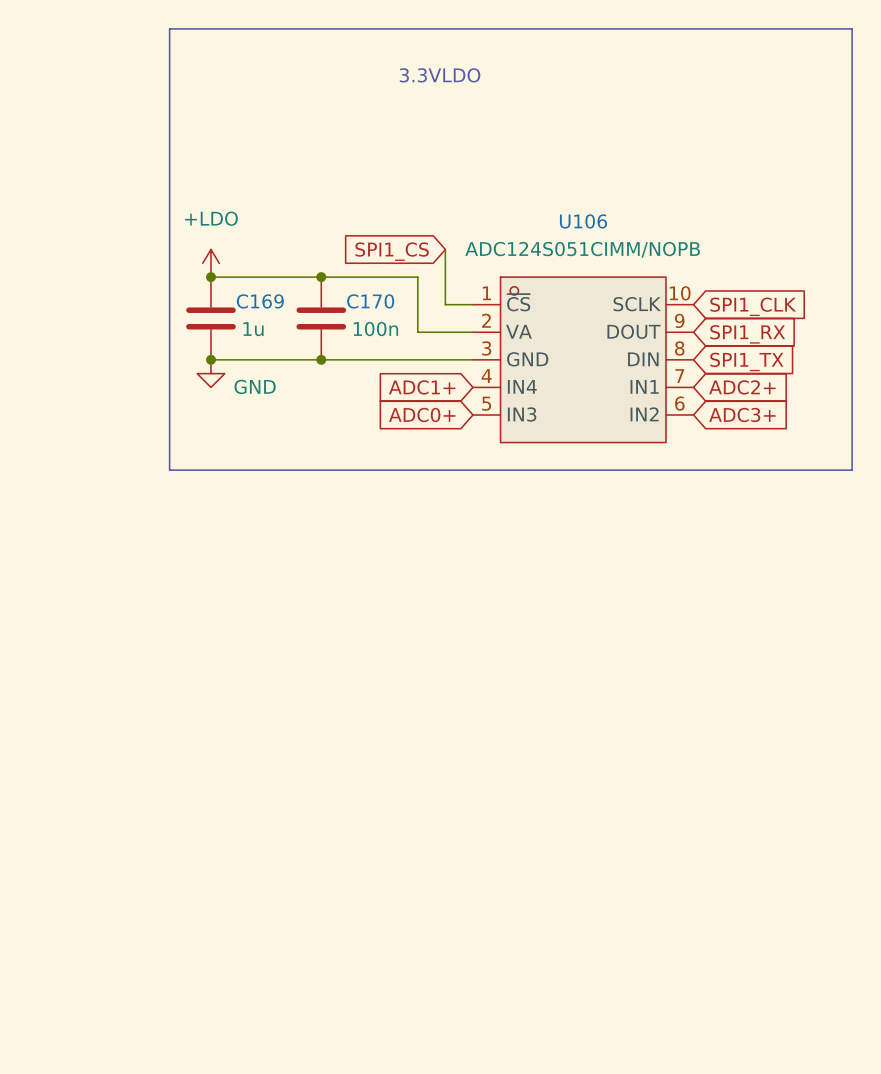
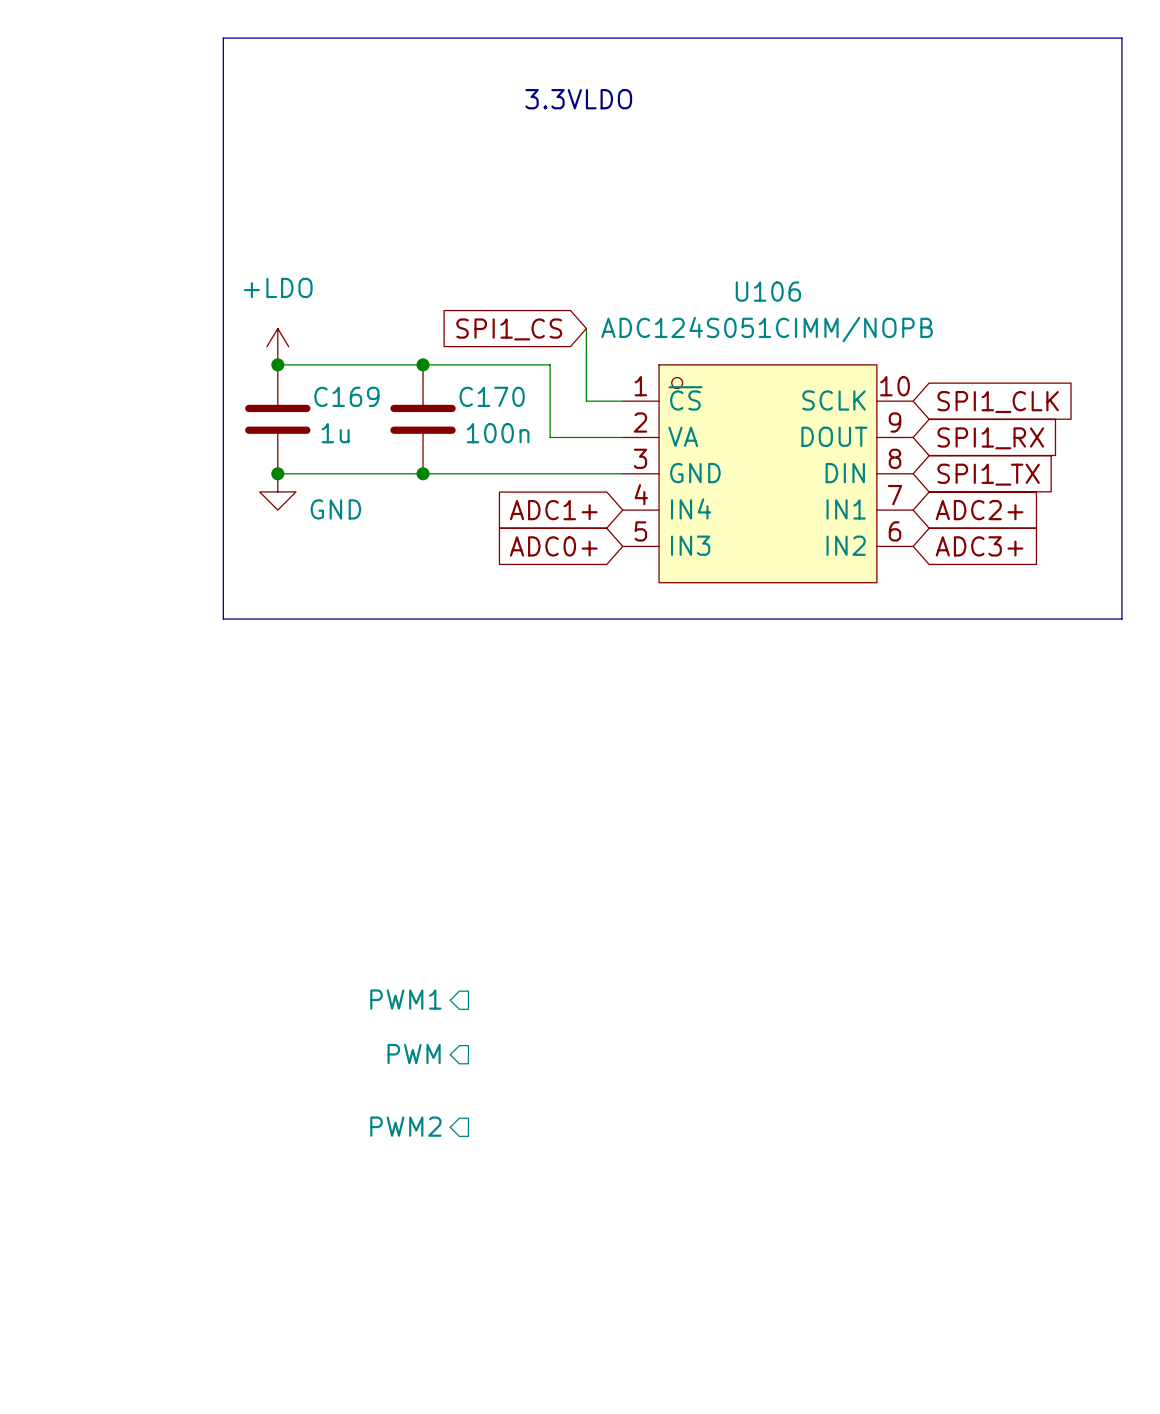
sheet pin: none -> PWM1 (405, 999)
sheet pin: none -> PWM (414, 1054)
sheet pin: none -> PWM2 (405, 1126)

